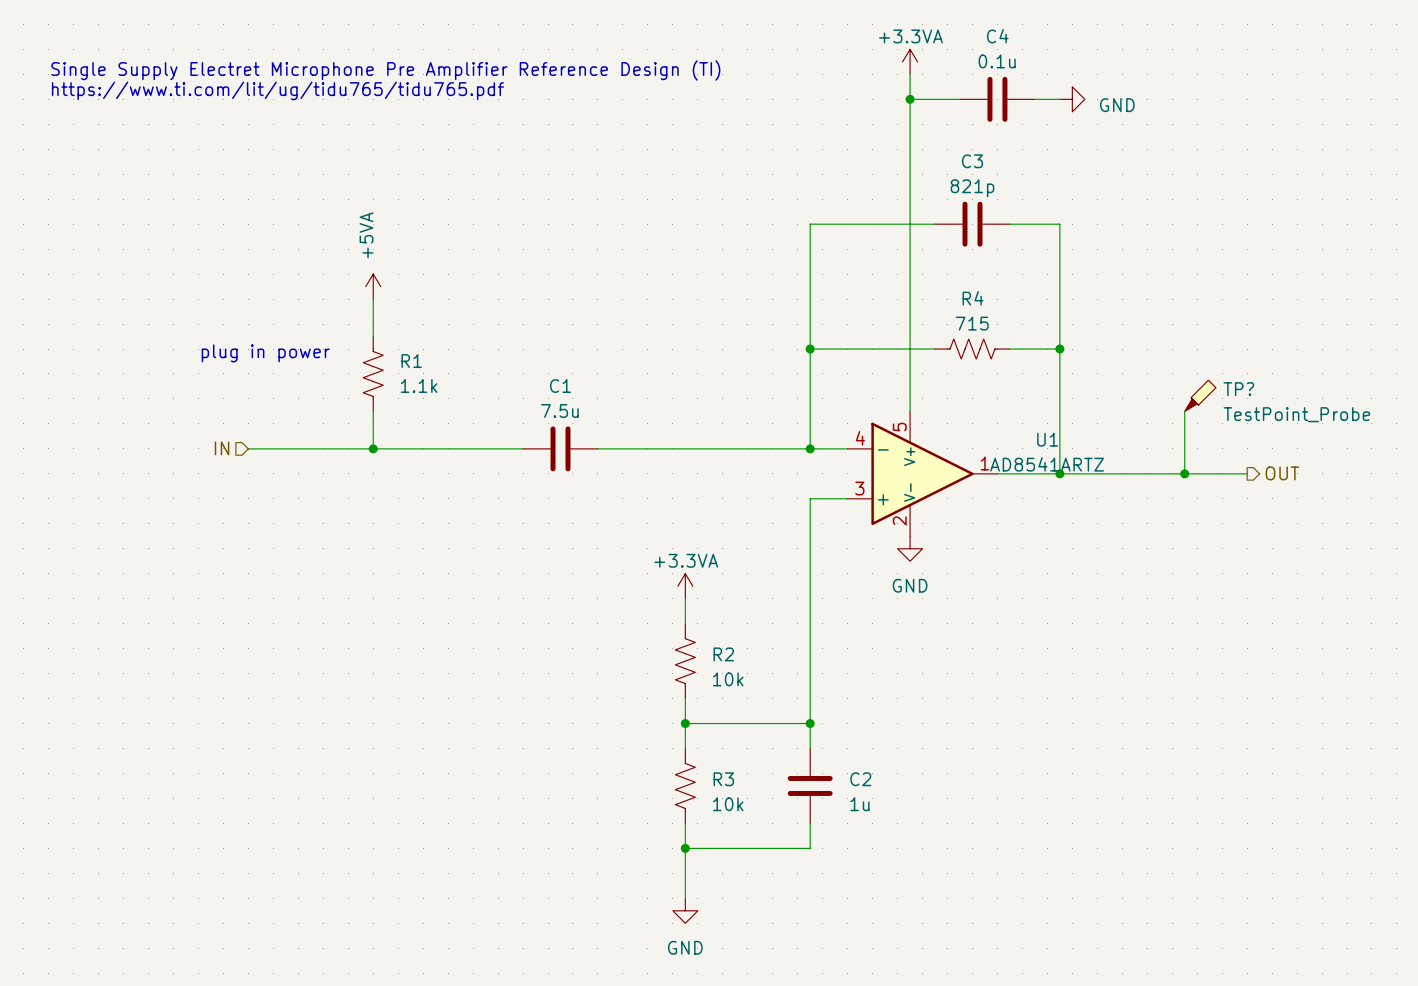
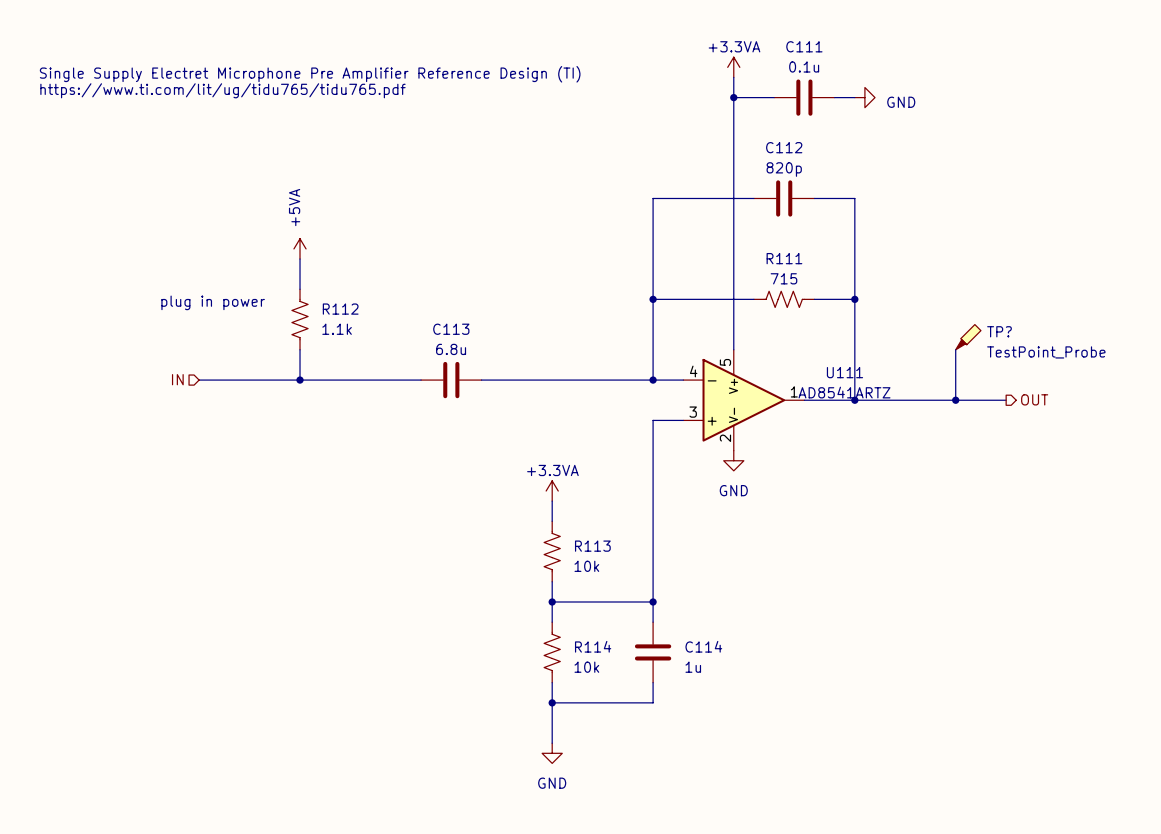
C4 name: C4 (997, 36) -> C111 (804, 46)
C3 name: C3 (972, 161) -> C112 (784, 147)
C3 value: 821p (972, 188) -> 820p (784, 169)
R4 name: R4 (973, 298) -> R111 (784, 258)
R1 name: R1 (411, 361) -> R112 (340, 309)
C1 name: C1 (560, 386) -> C113 (451, 329)
C1 value: 7.5u (559, 410) -> 6.8u (451, 349)
U1 name: U1 (1047, 439) -> U111 (844, 372)
R2 name: R2 (723, 654) -> R113 (592, 546)
R3 name: R3 (723, 779) -> R114 (593, 646)
C2 name: C2 (860, 779) -> C114 (703, 646)

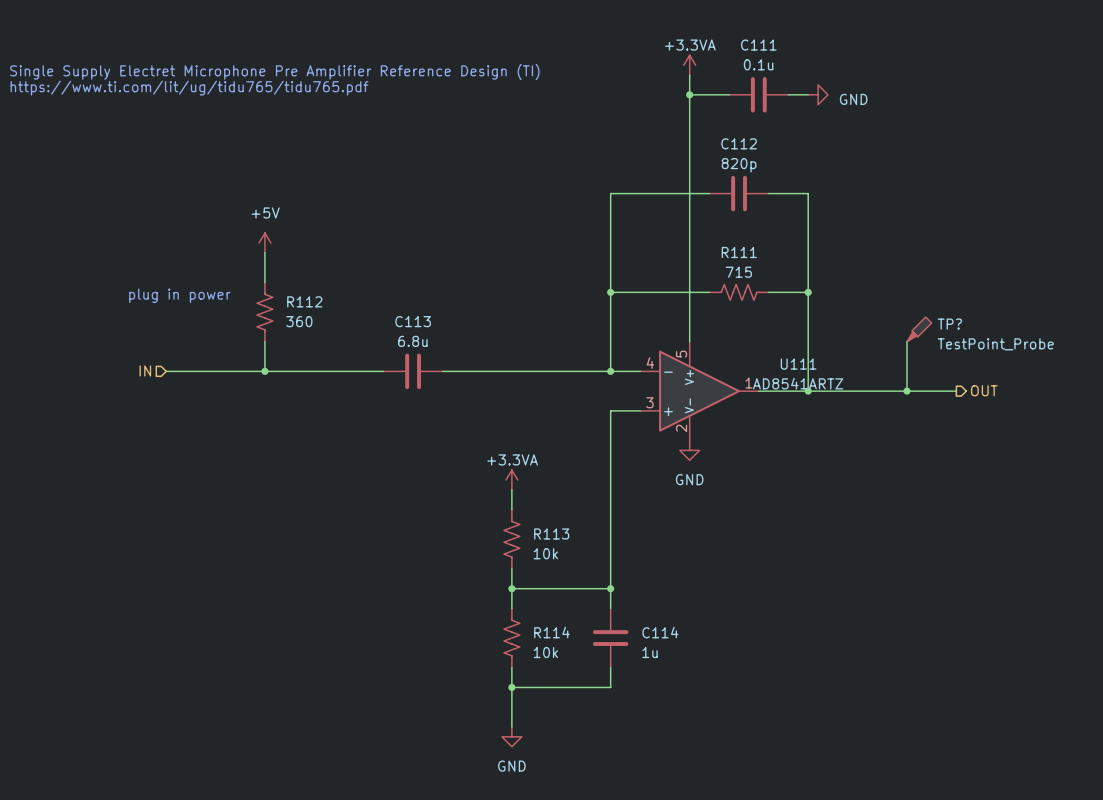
power symbol: +5VA (300, 248) -> +5V (264, 242)
R112 value: 1.1k (337, 329) -> 360 (299, 321)

